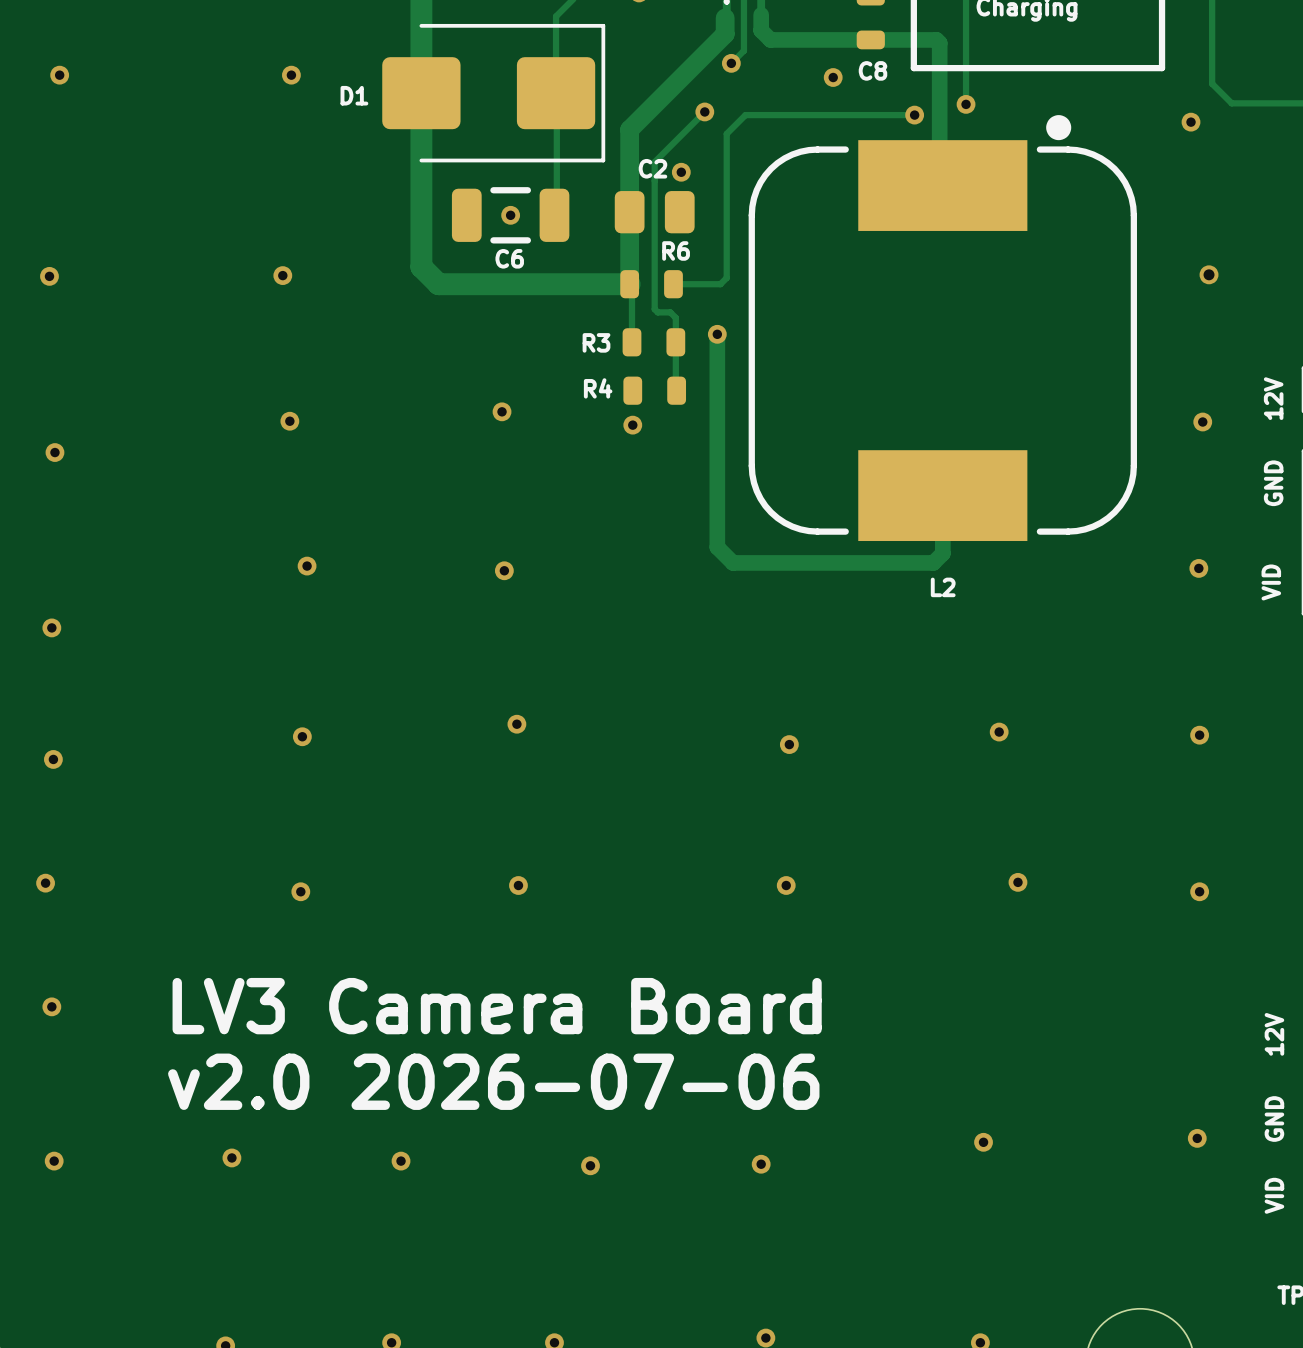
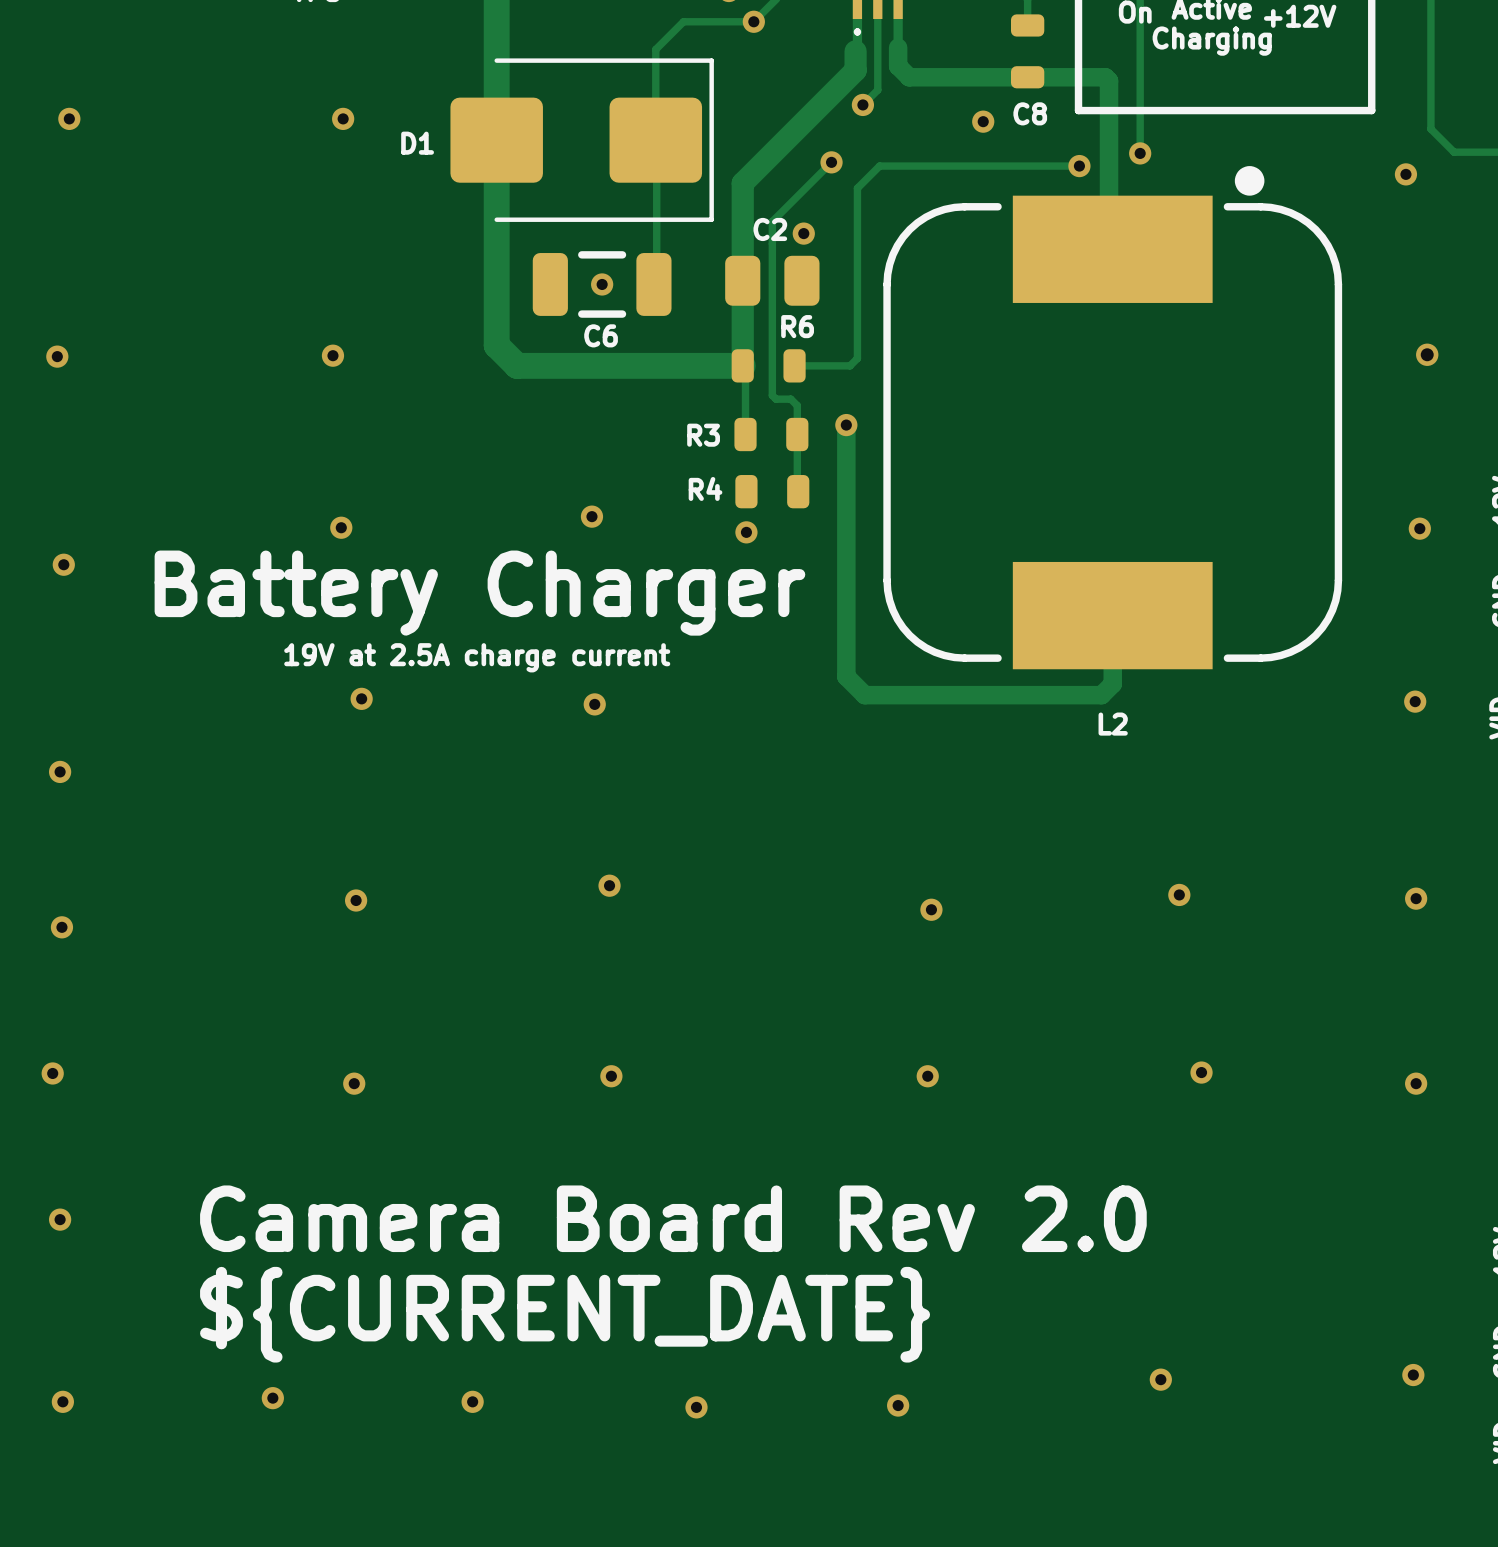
text: none -> Battery Charger (479, 593)
text: none -> 19V at 2.5A charge current (477, 657)
text: LV3 Camera Board (497, 1006) -> Camera Board Rev 2.0 (673, 1218)
text: v2.0 2026-07-06 (493, 1081) -> ${CURRENT_DATE} (565, 1314)

